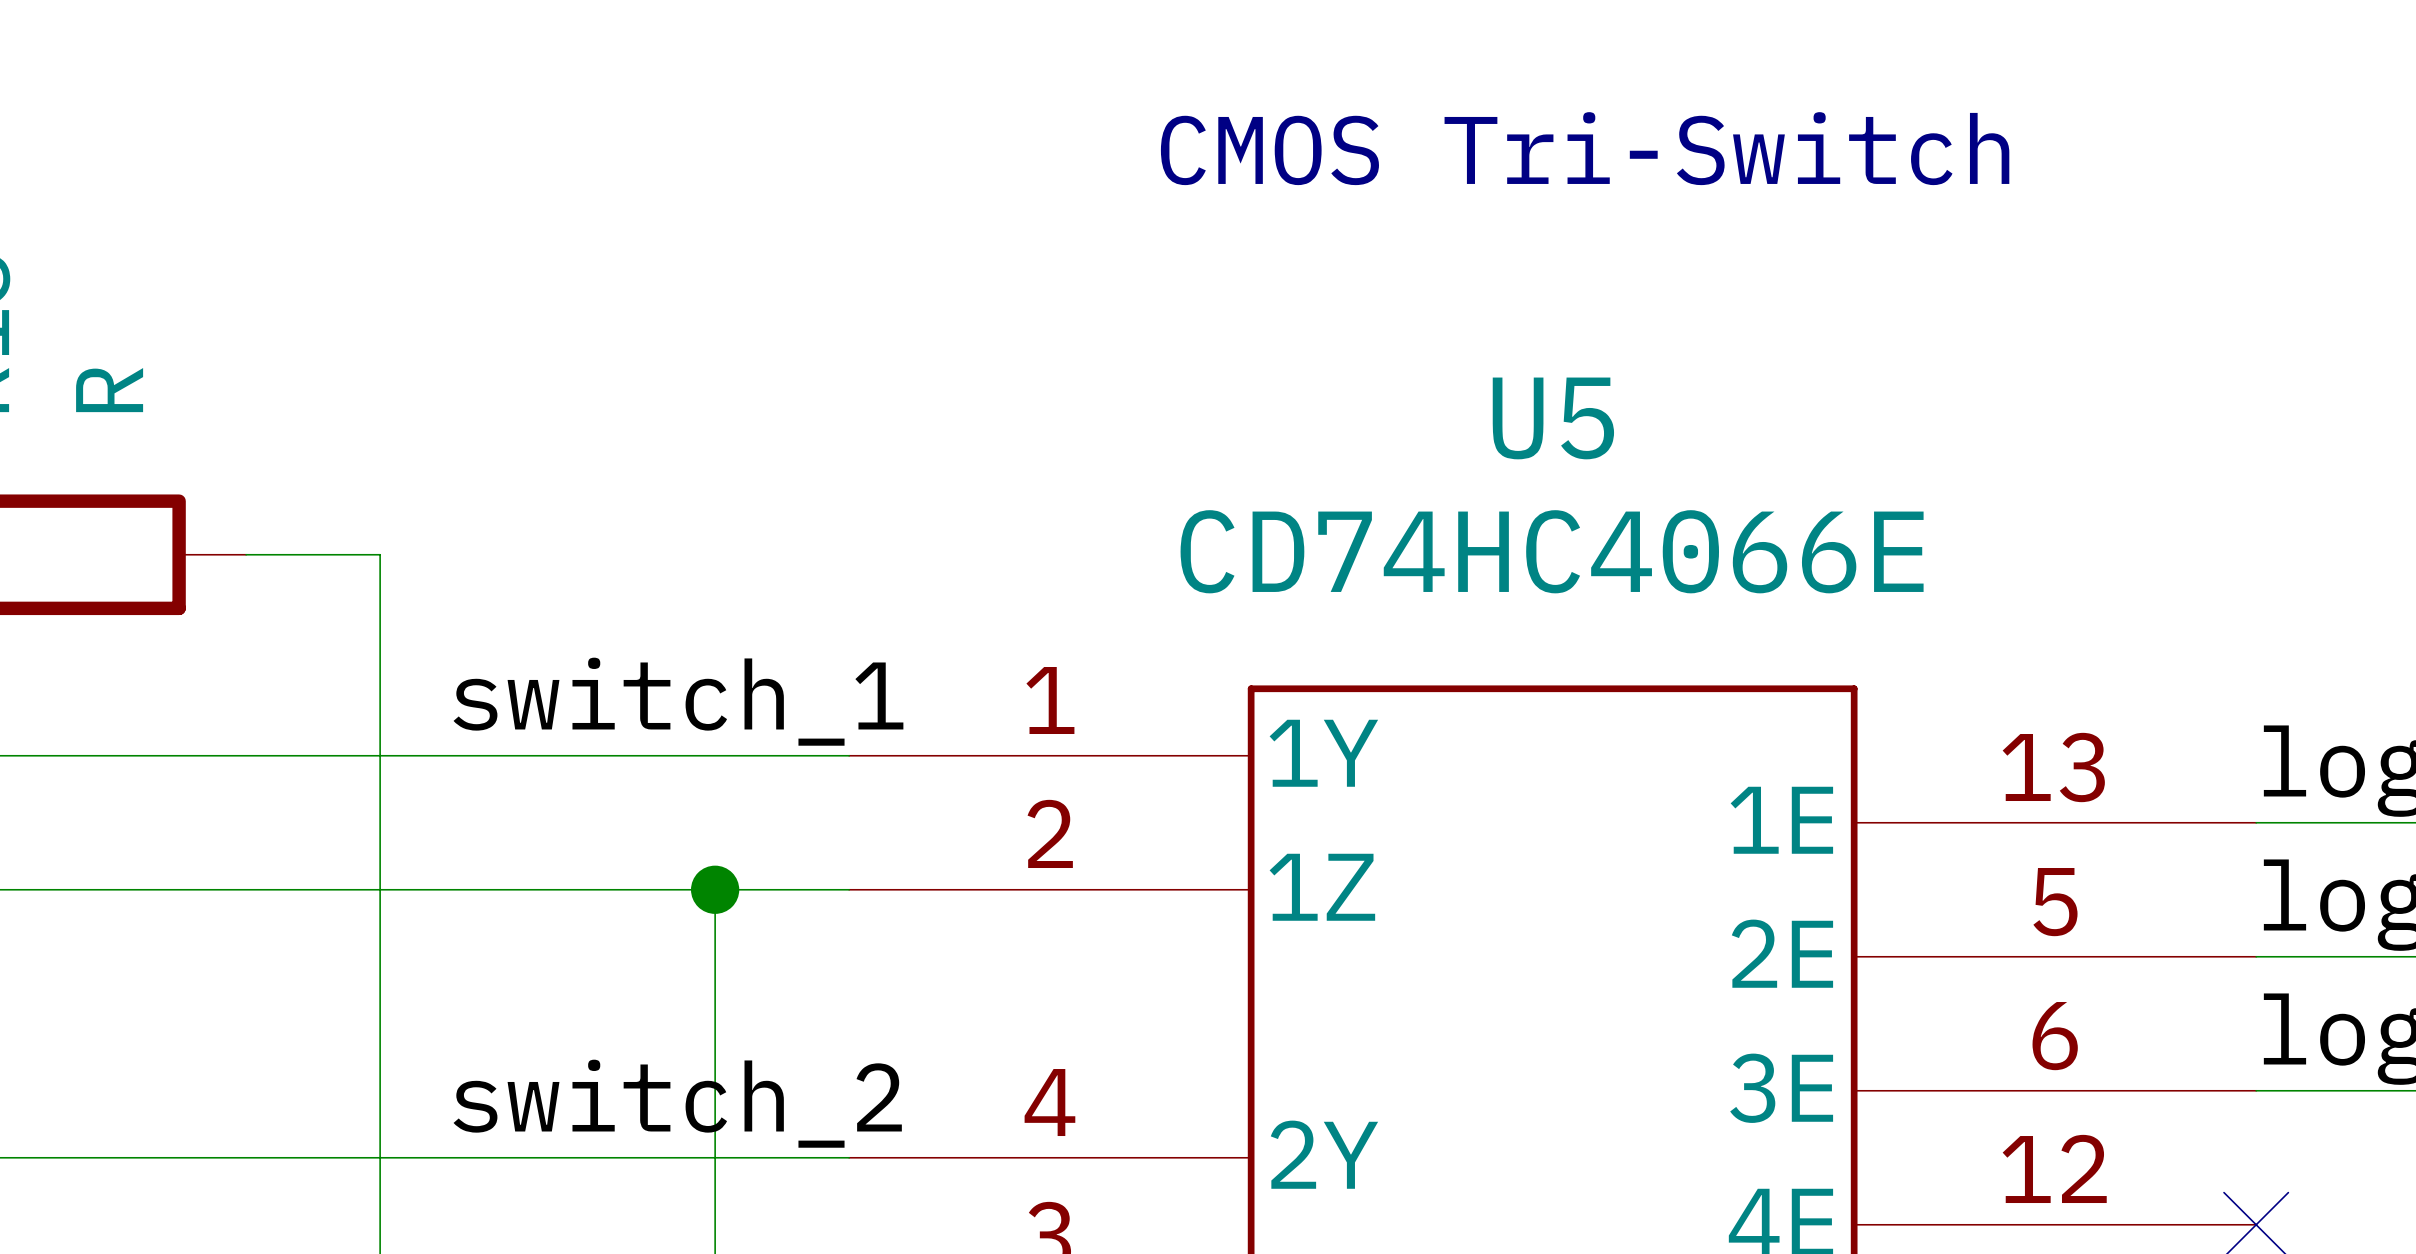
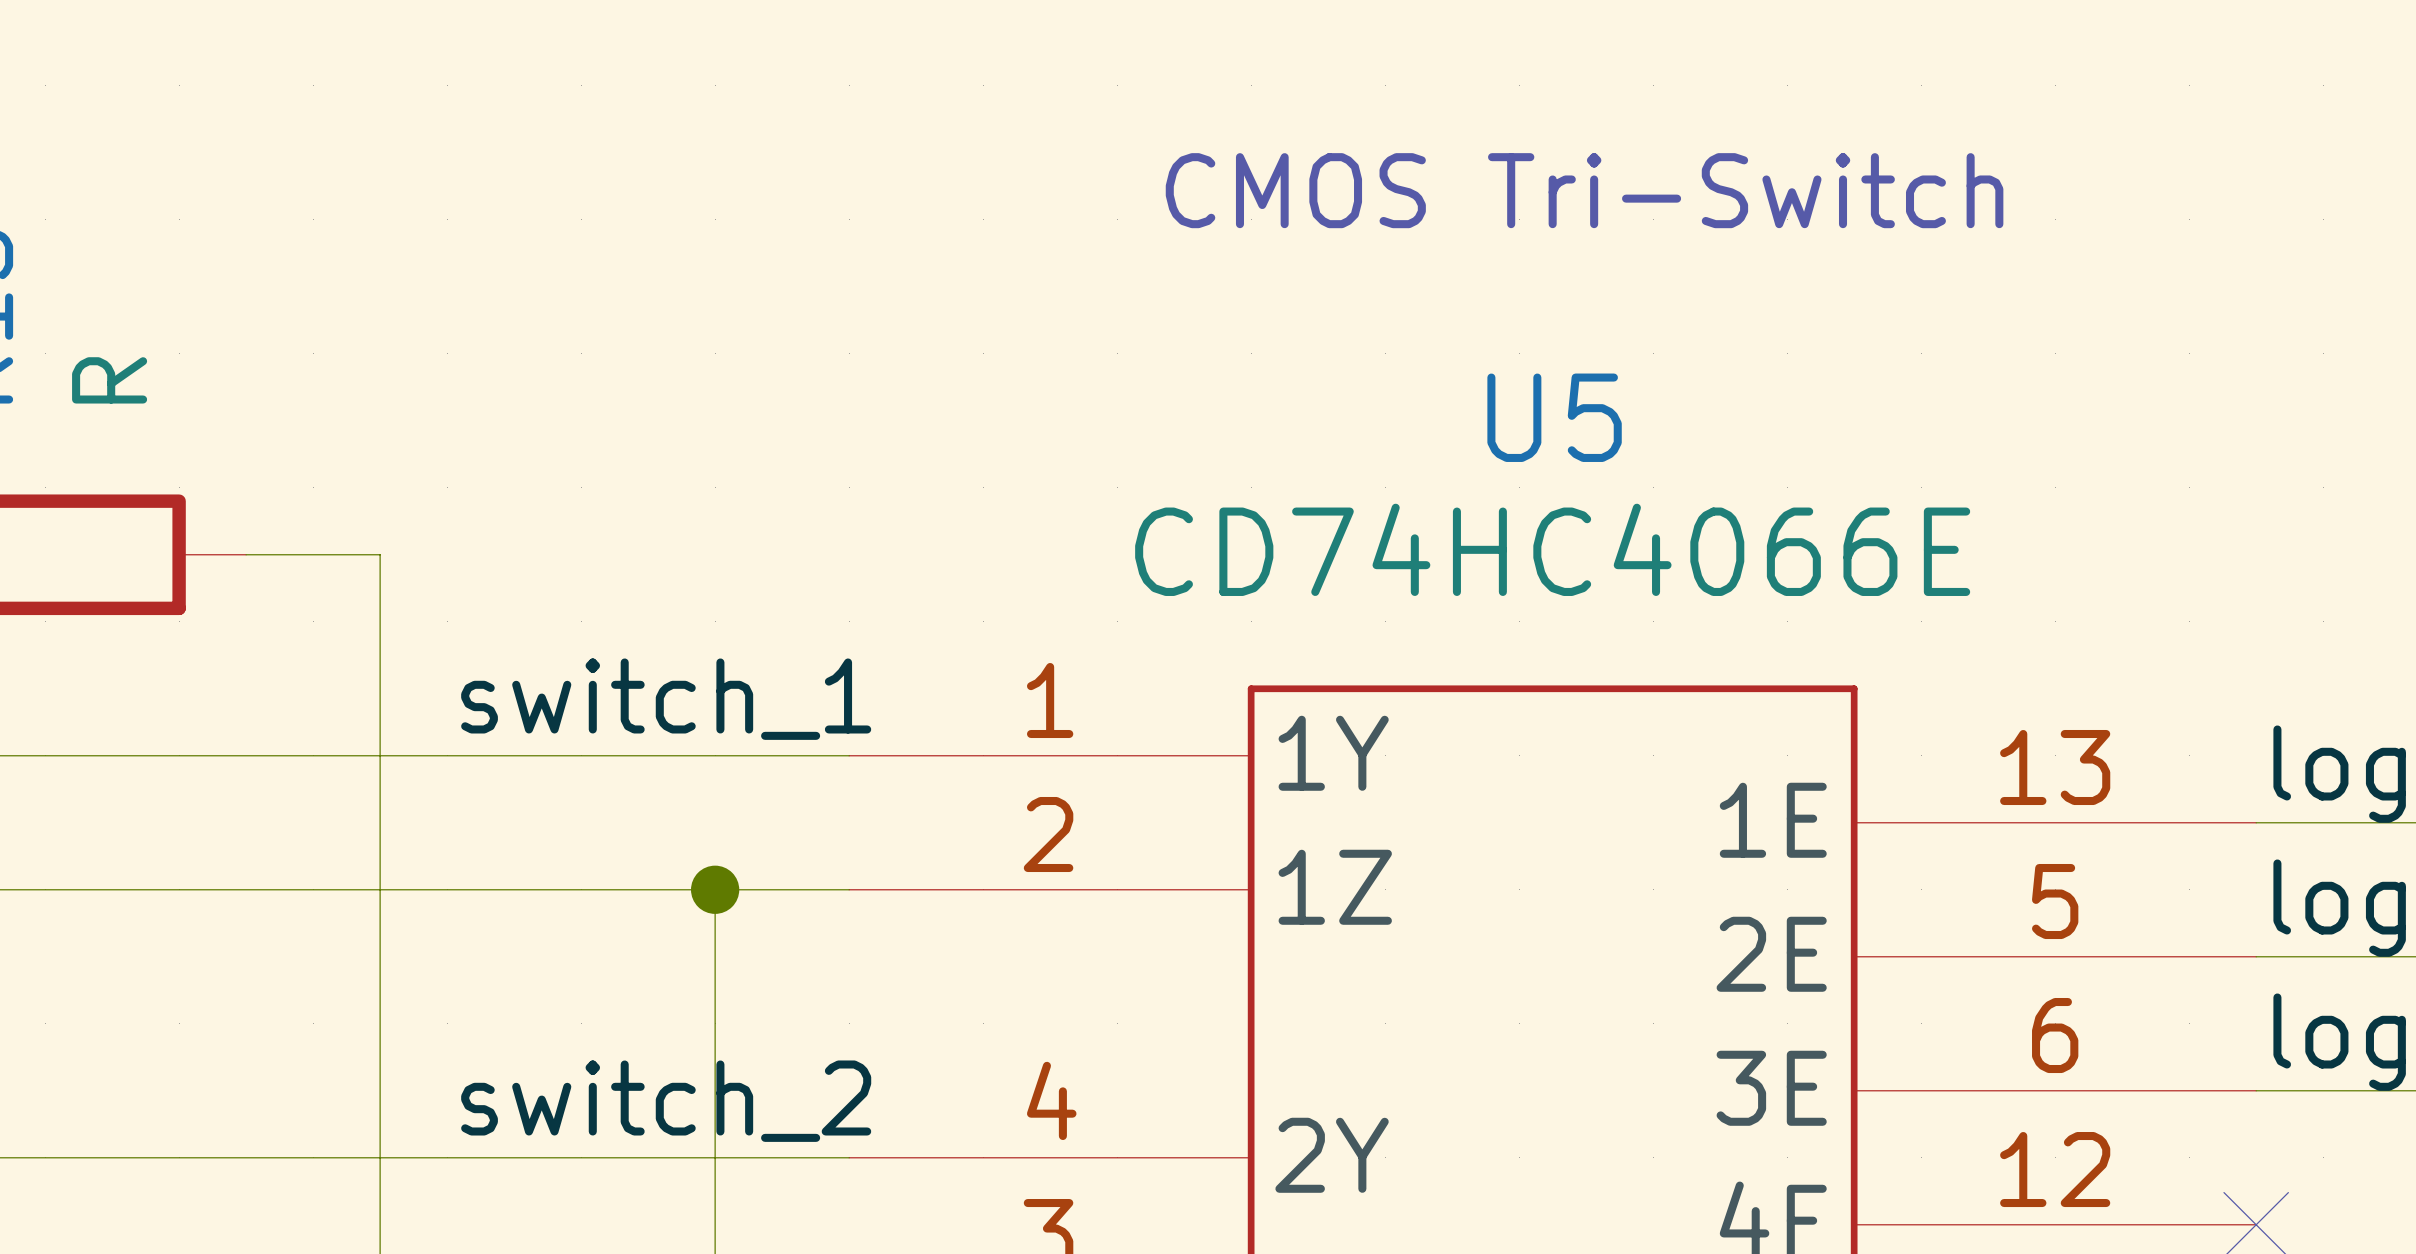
text position: CMOS Tri-Switch (1585, 148) -> CMOS Tri-Switch (1584, 190)

